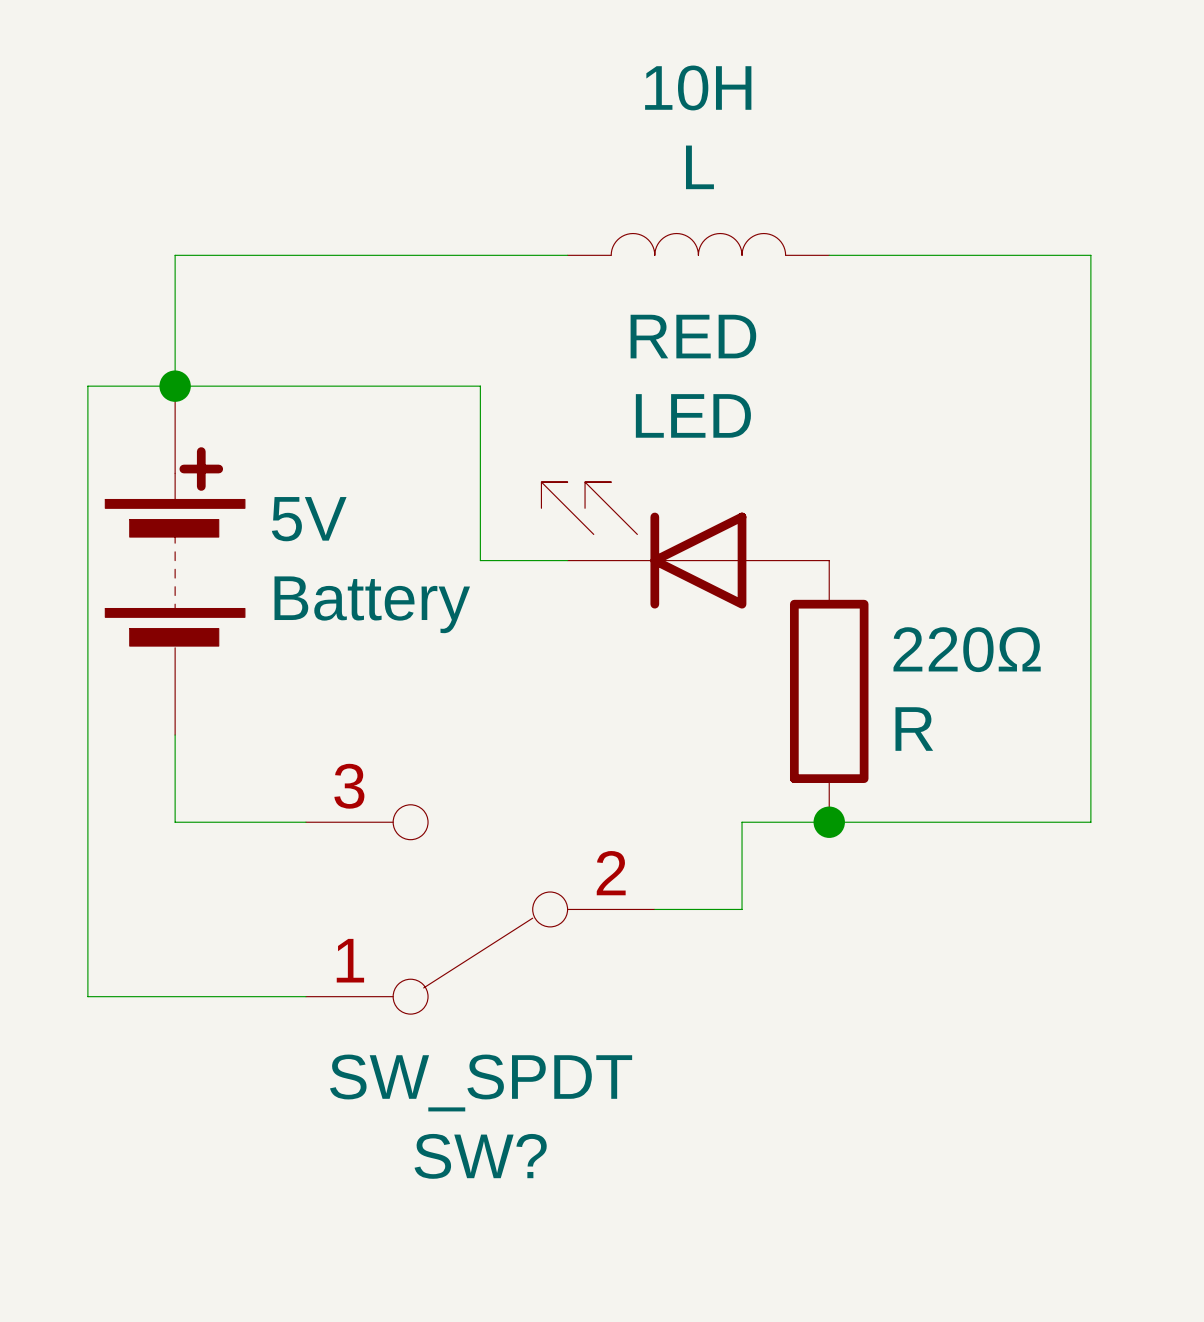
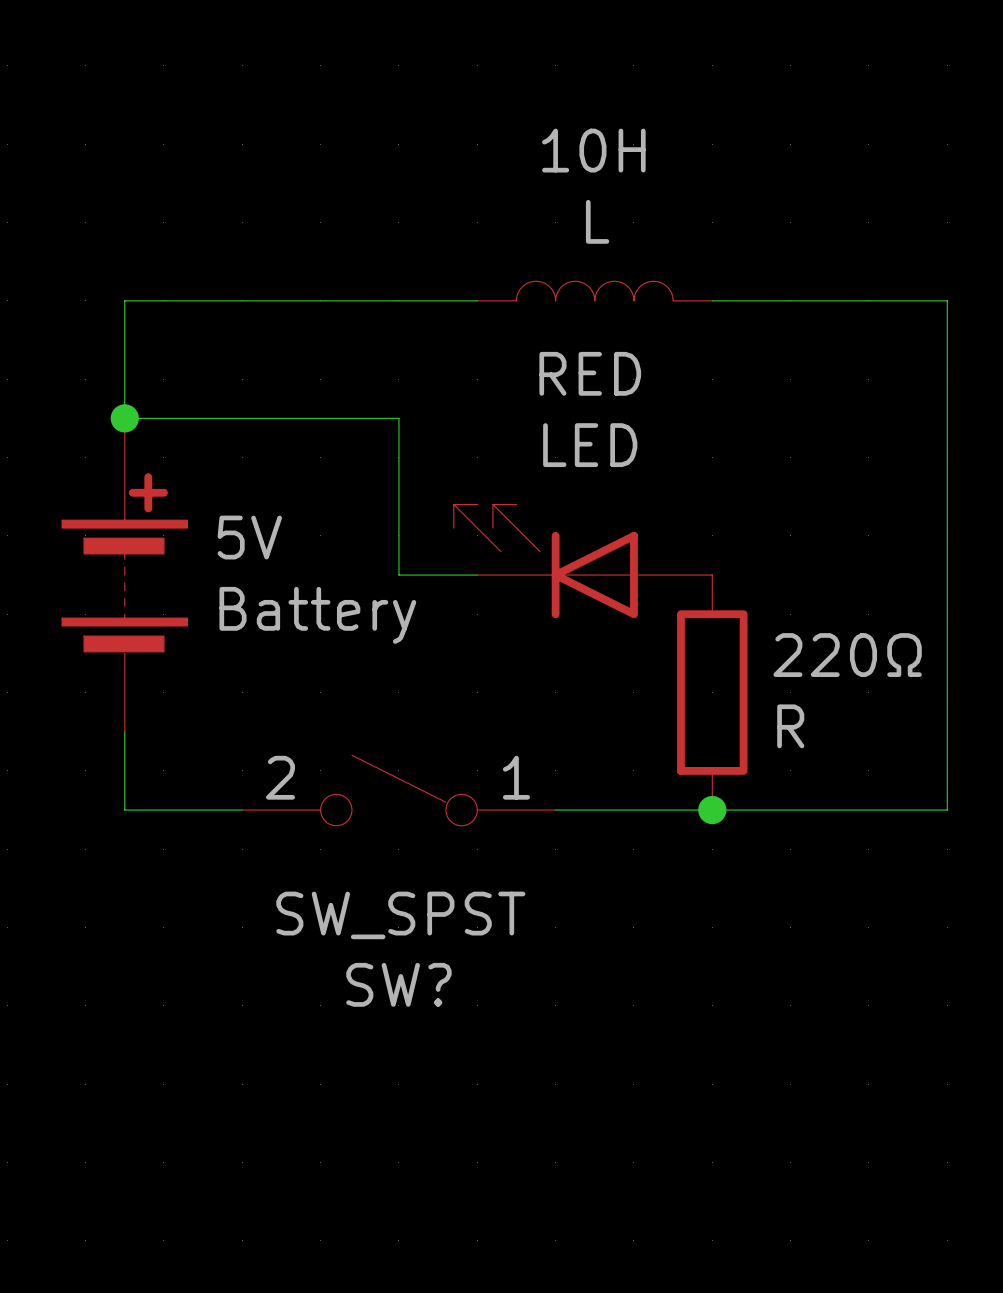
wire: (175, 386) (87, 386) (87, 996) (305, 996) -> none
SW?: none -> SW_SPST (398, 790)
wire: (742, 822) (742, 909) (654, 909) -> (633, 810) (555, 810)
SW?: SW_SPDT (480, 909) -> none

